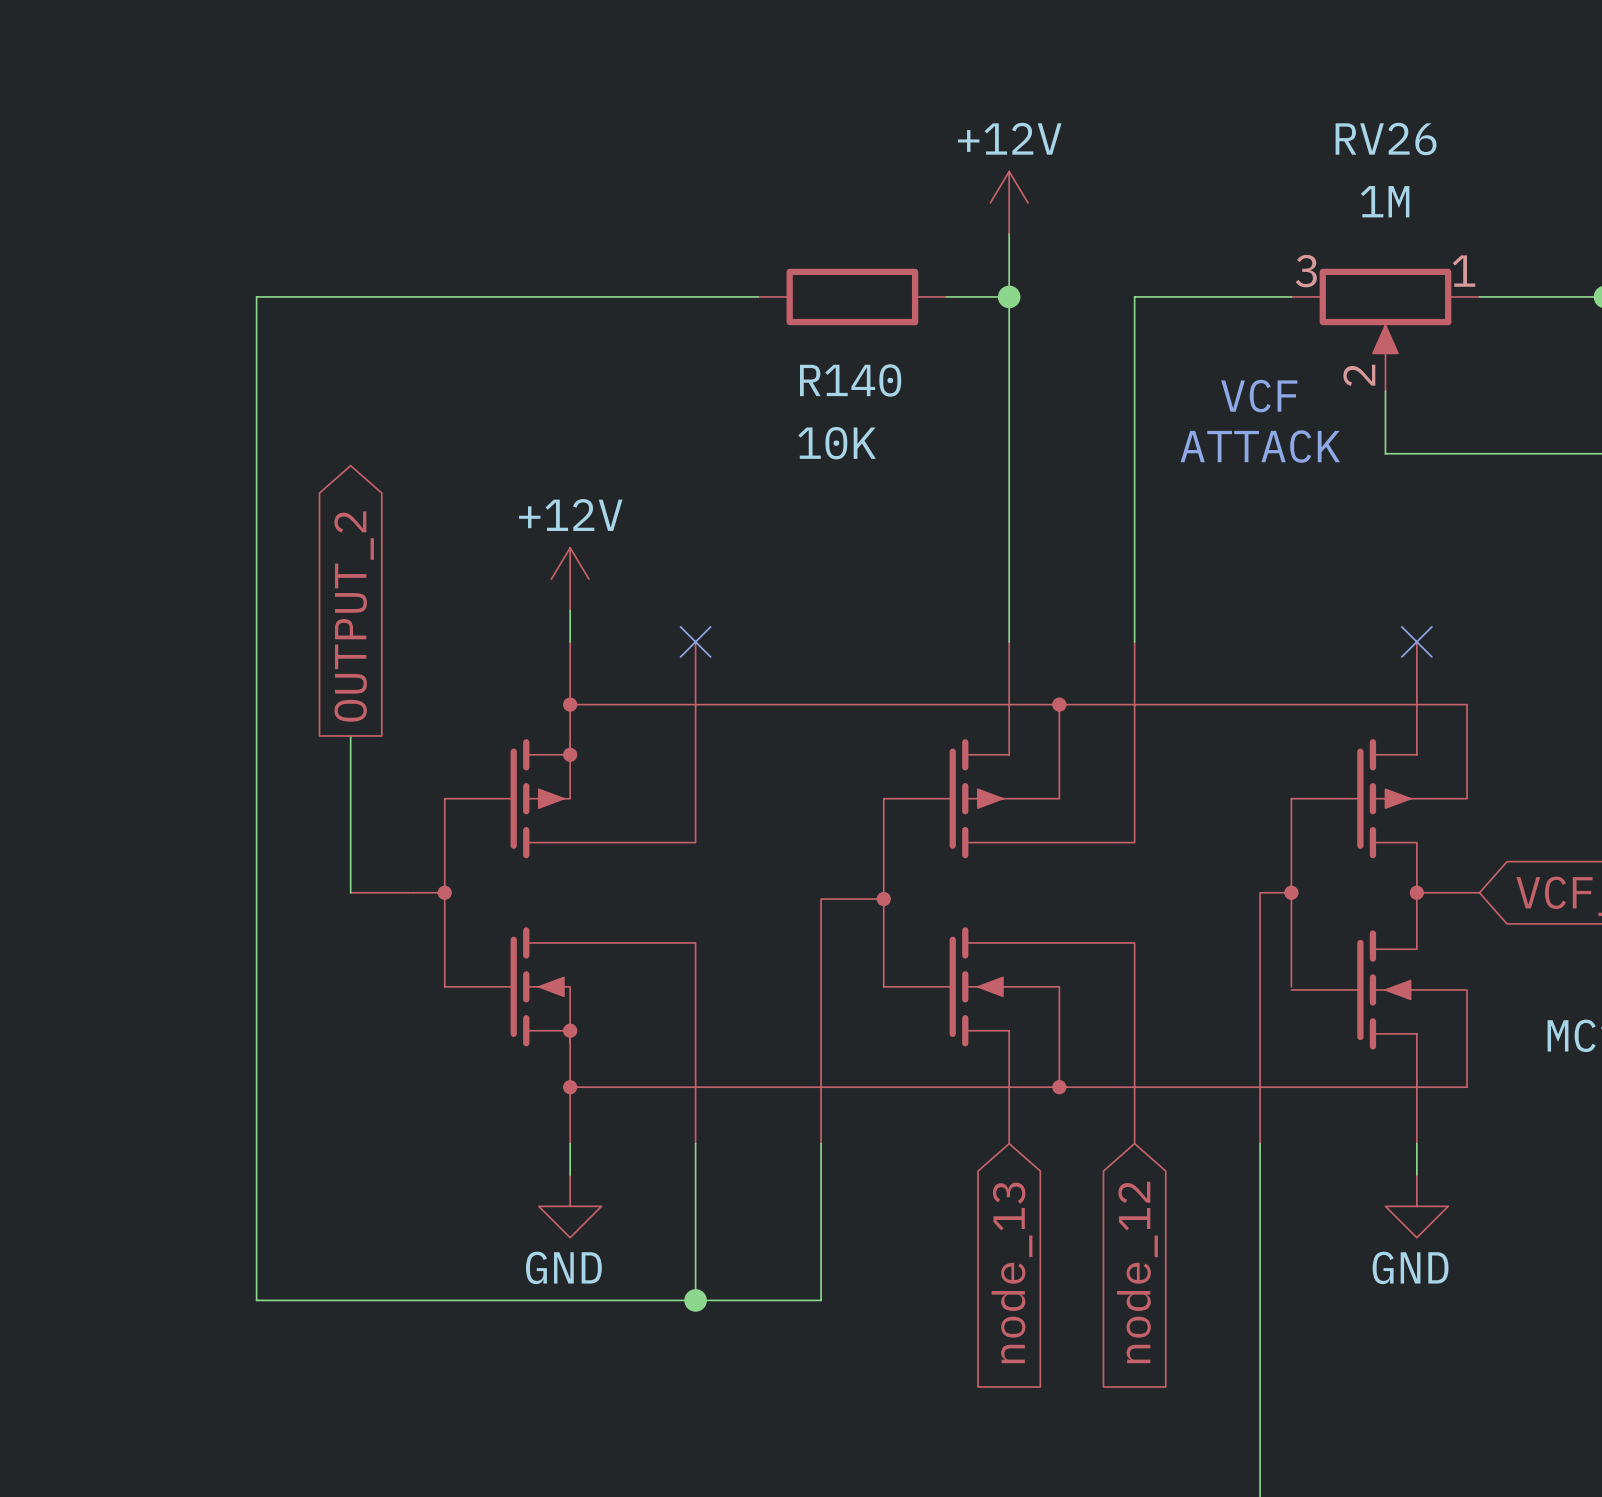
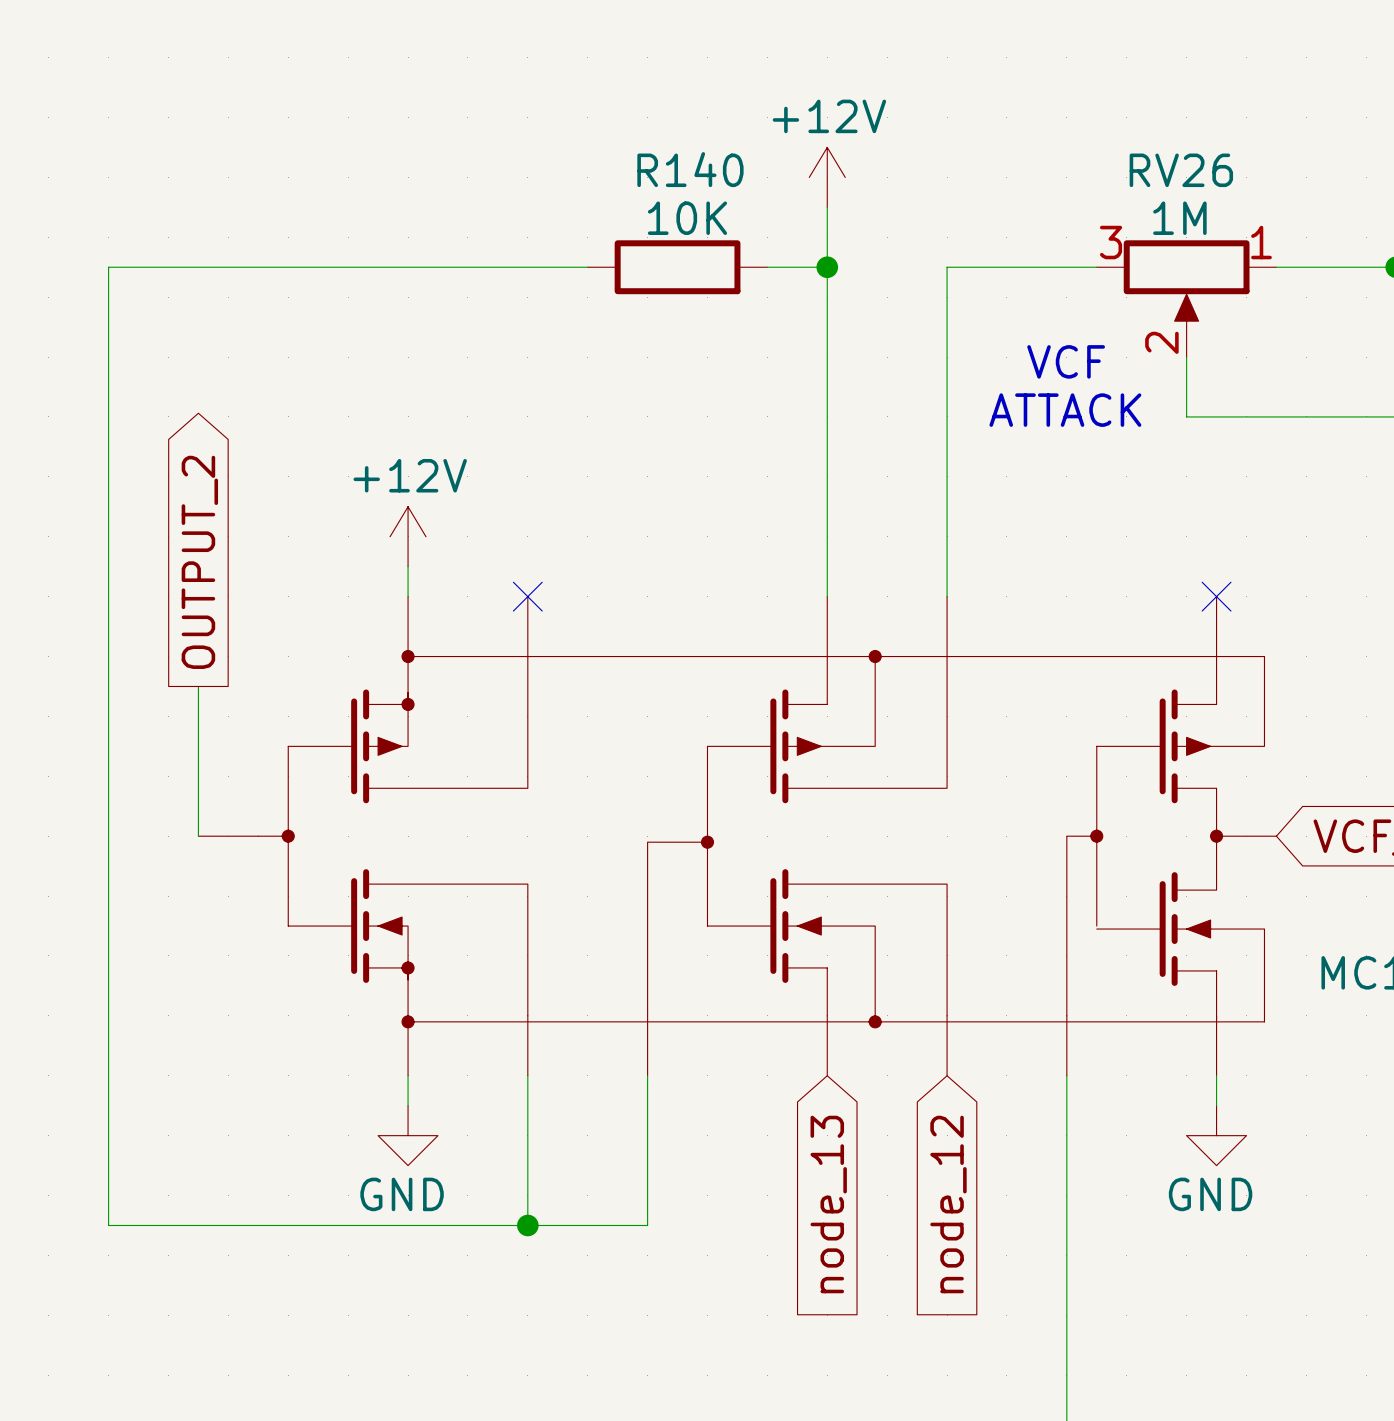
RV26 name position: RV26 (1386, 138) -> RV26 (1181, 170)
RV26 value position: 1M (1385, 201) -> 1M (1179, 218)
R140 name position: R140 (850, 380) -> R140 (690, 169)
R140 value position: 10K (837, 443) -> 10K (687, 218)

